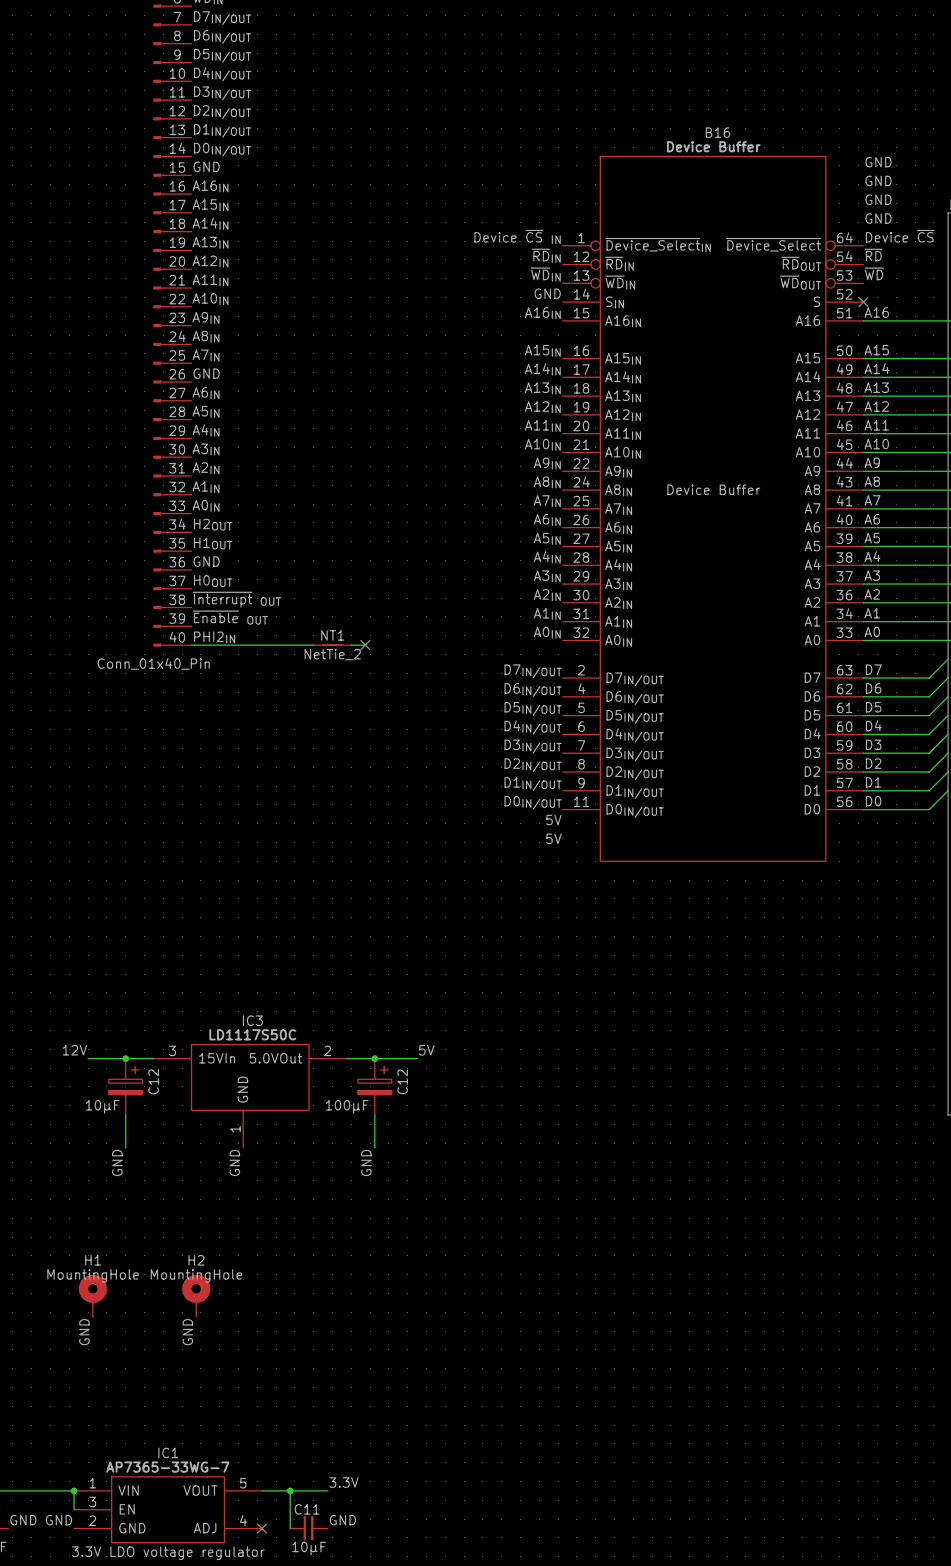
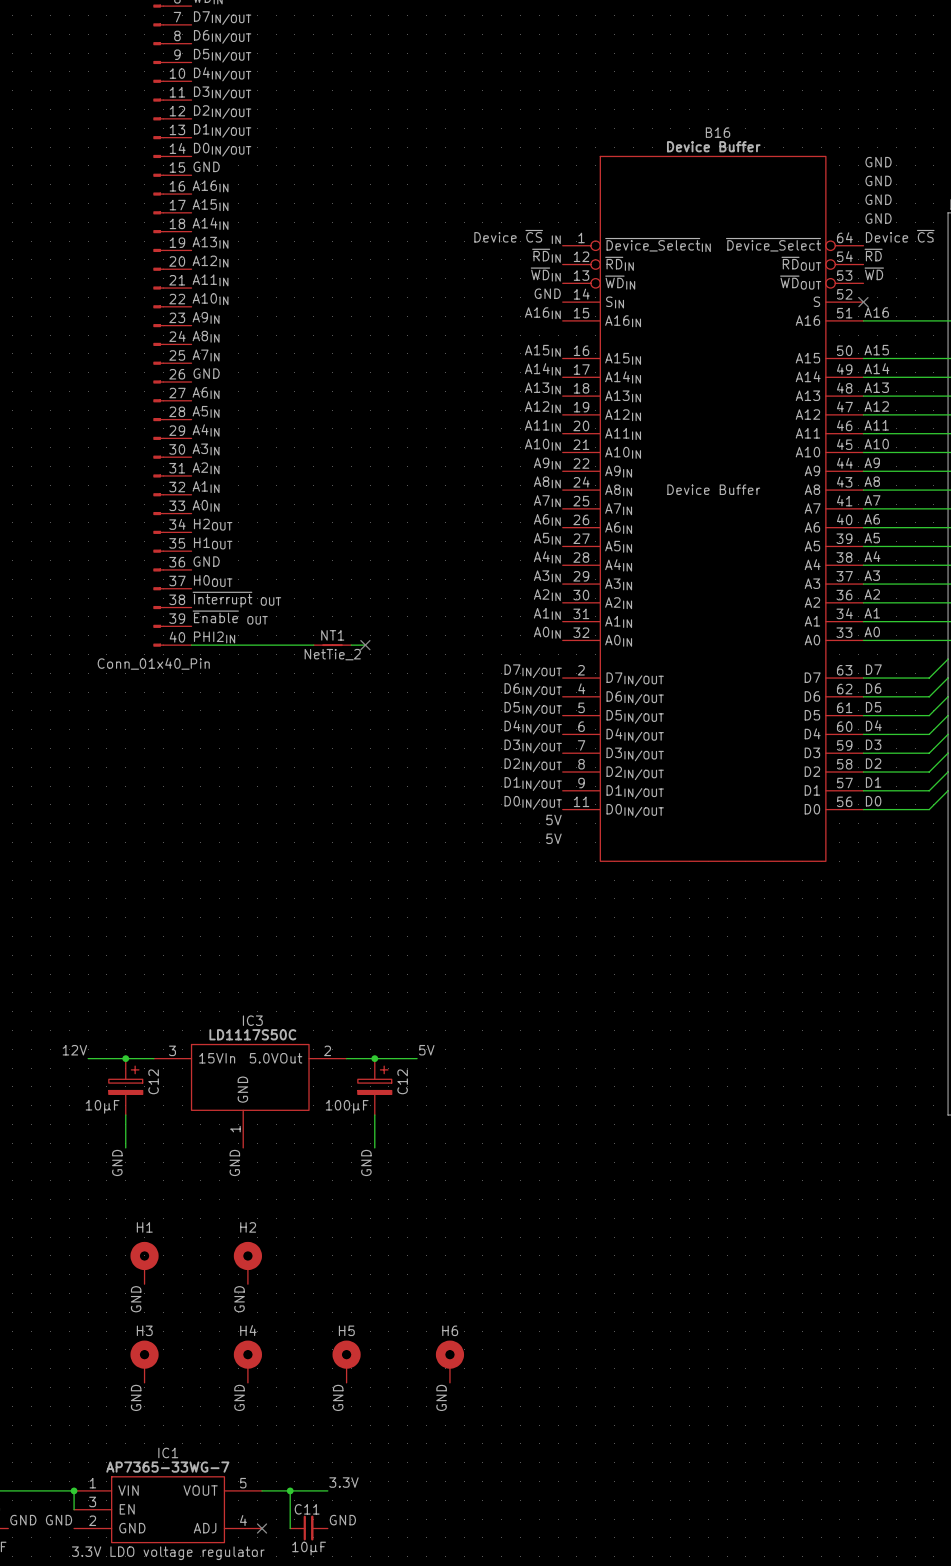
H1 value: MountingHole (93, 1275) -> none
H2 value: MountingHole (196, 1275) -> none
H1 position: (92, 1295) -> (144, 1263)
H2 position: (196, 1295) -> (247, 1263)
label: none -> GND (136, 1299)
label: none -> GND (239, 1299)
label: GND (84, 1332) -> none
label: GND (187, 1332) -> none
H3: none -> (144, 1361)
H4: none -> (247, 1361)
H5: none -> (346, 1361)
H6: none -> (449, 1361)
label: none -> GND (136, 1397)
label: none -> GND (239, 1397)
label: none -> GND (338, 1397)
label: none -> GND (441, 1397)

